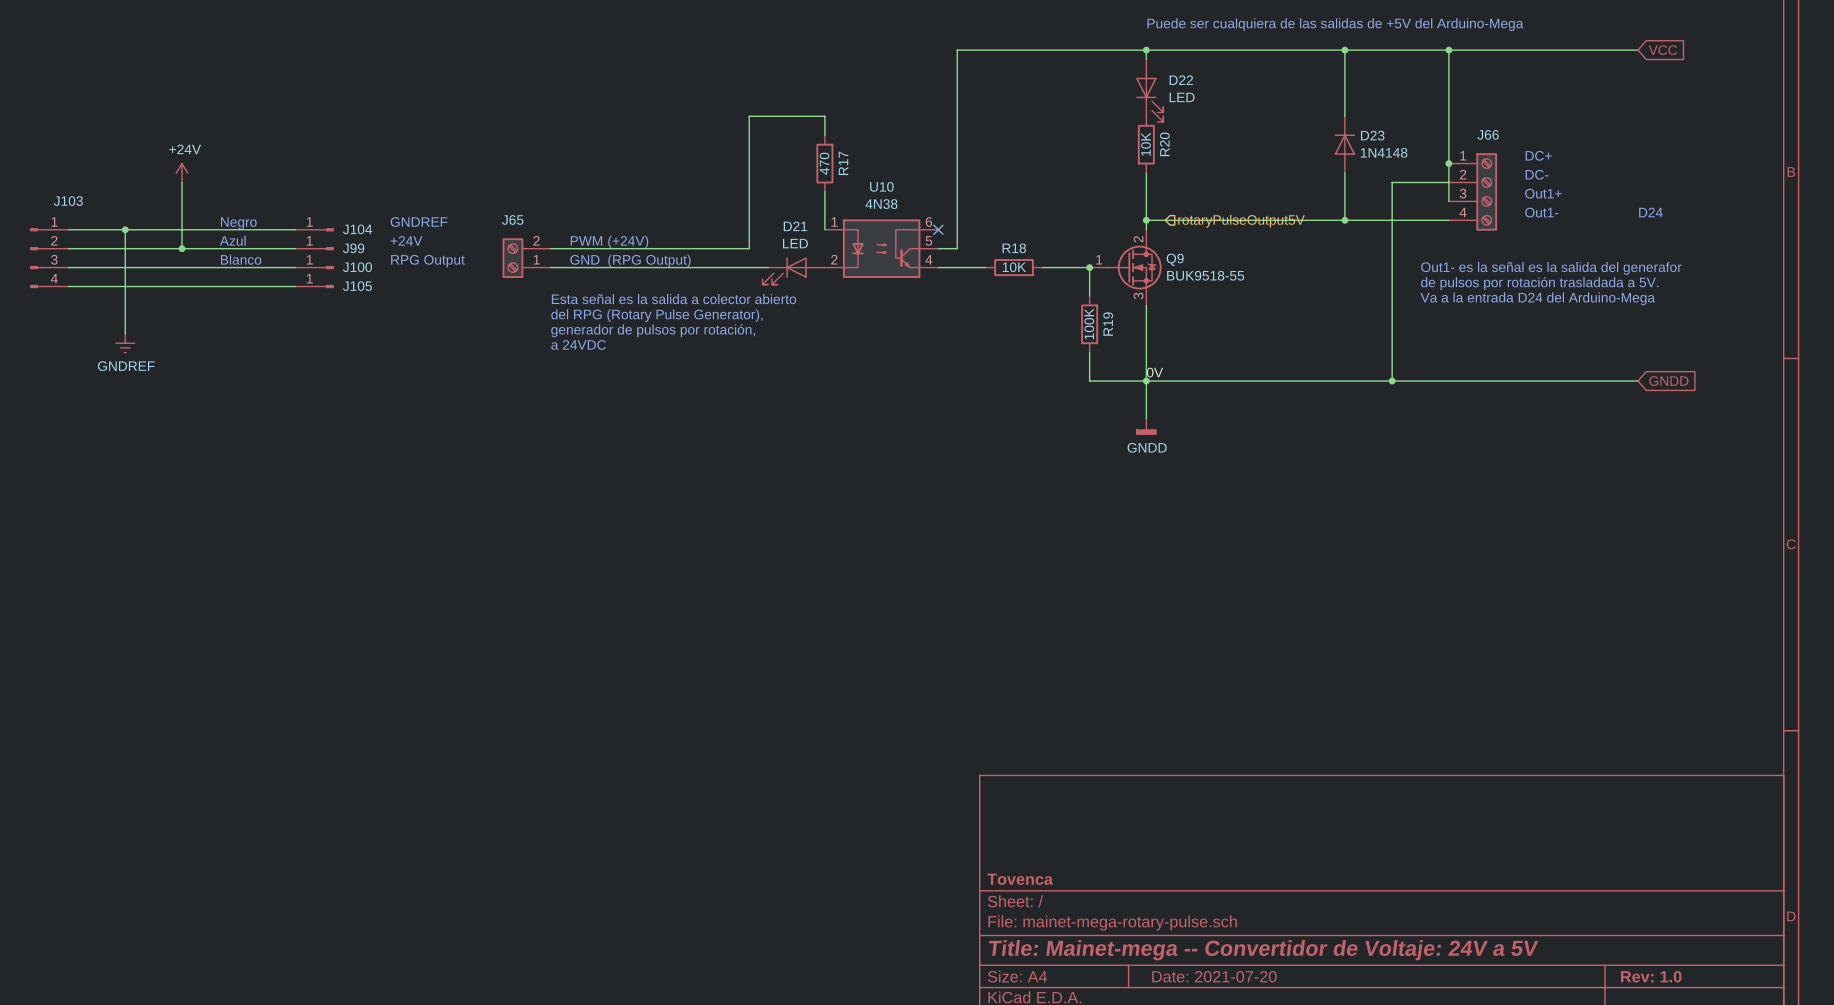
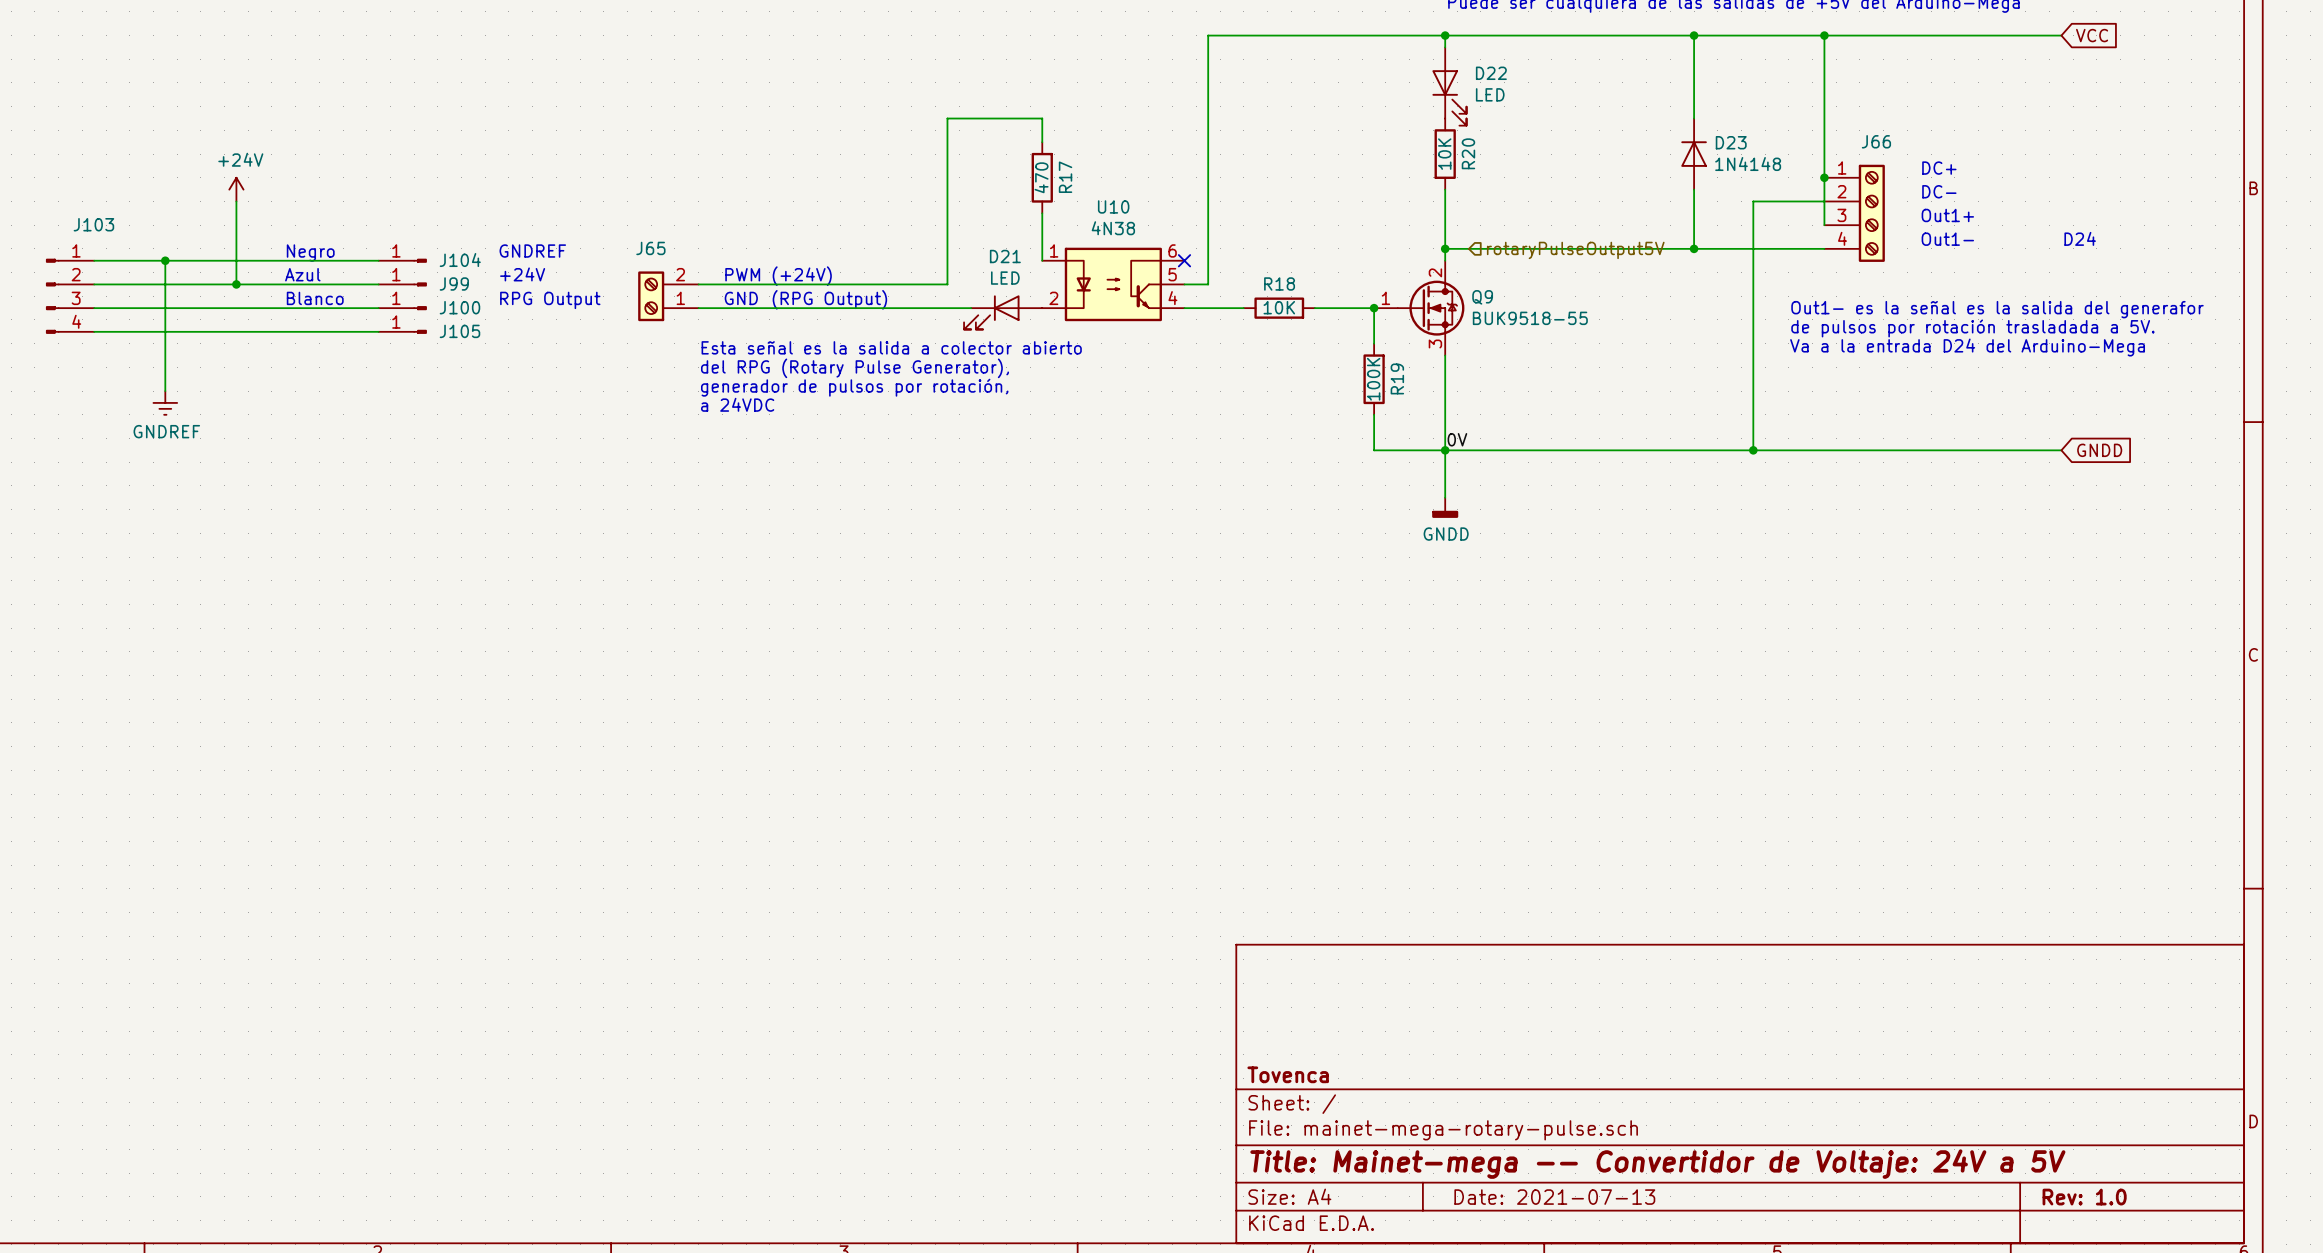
title block: Date: 2021-07-20 (1214, 976) -> Date: 2021-07-13 (1554, 1197)

